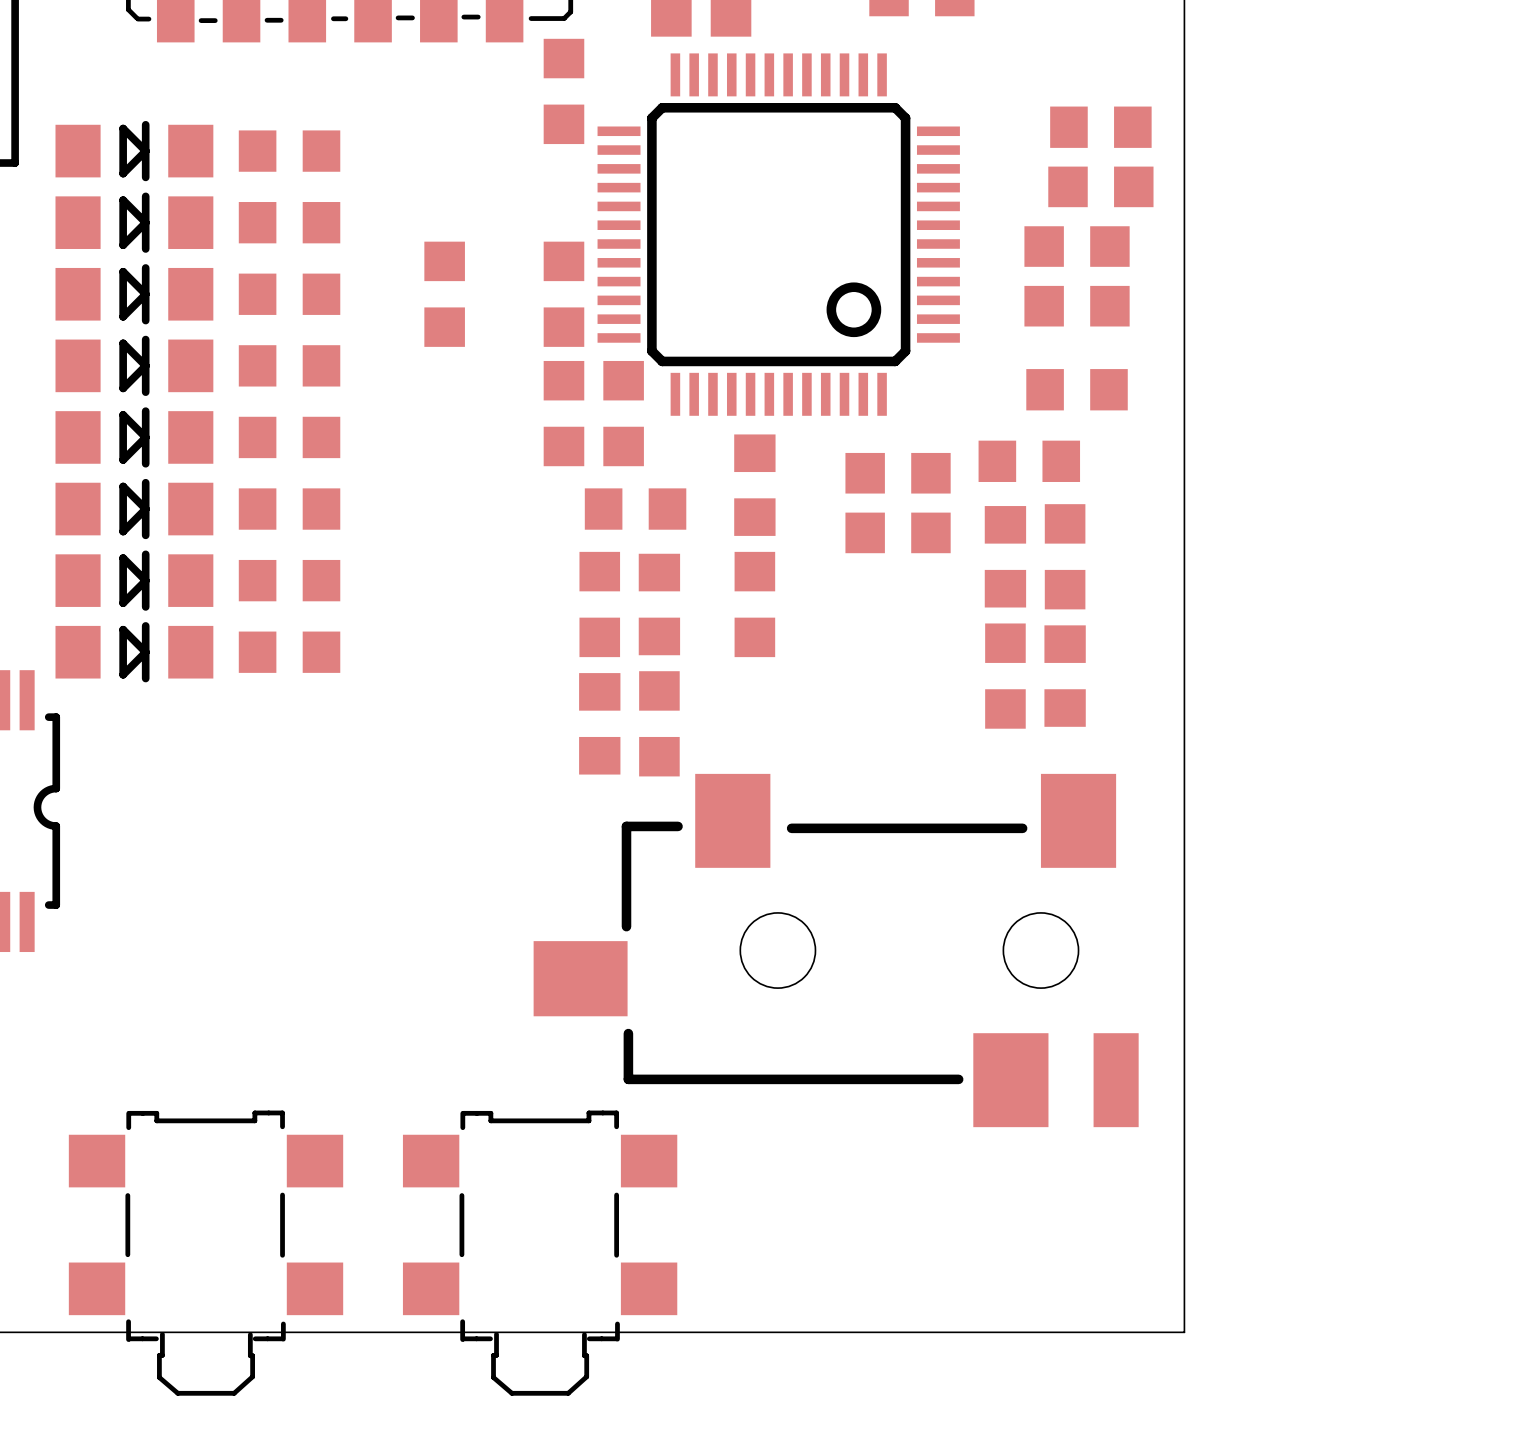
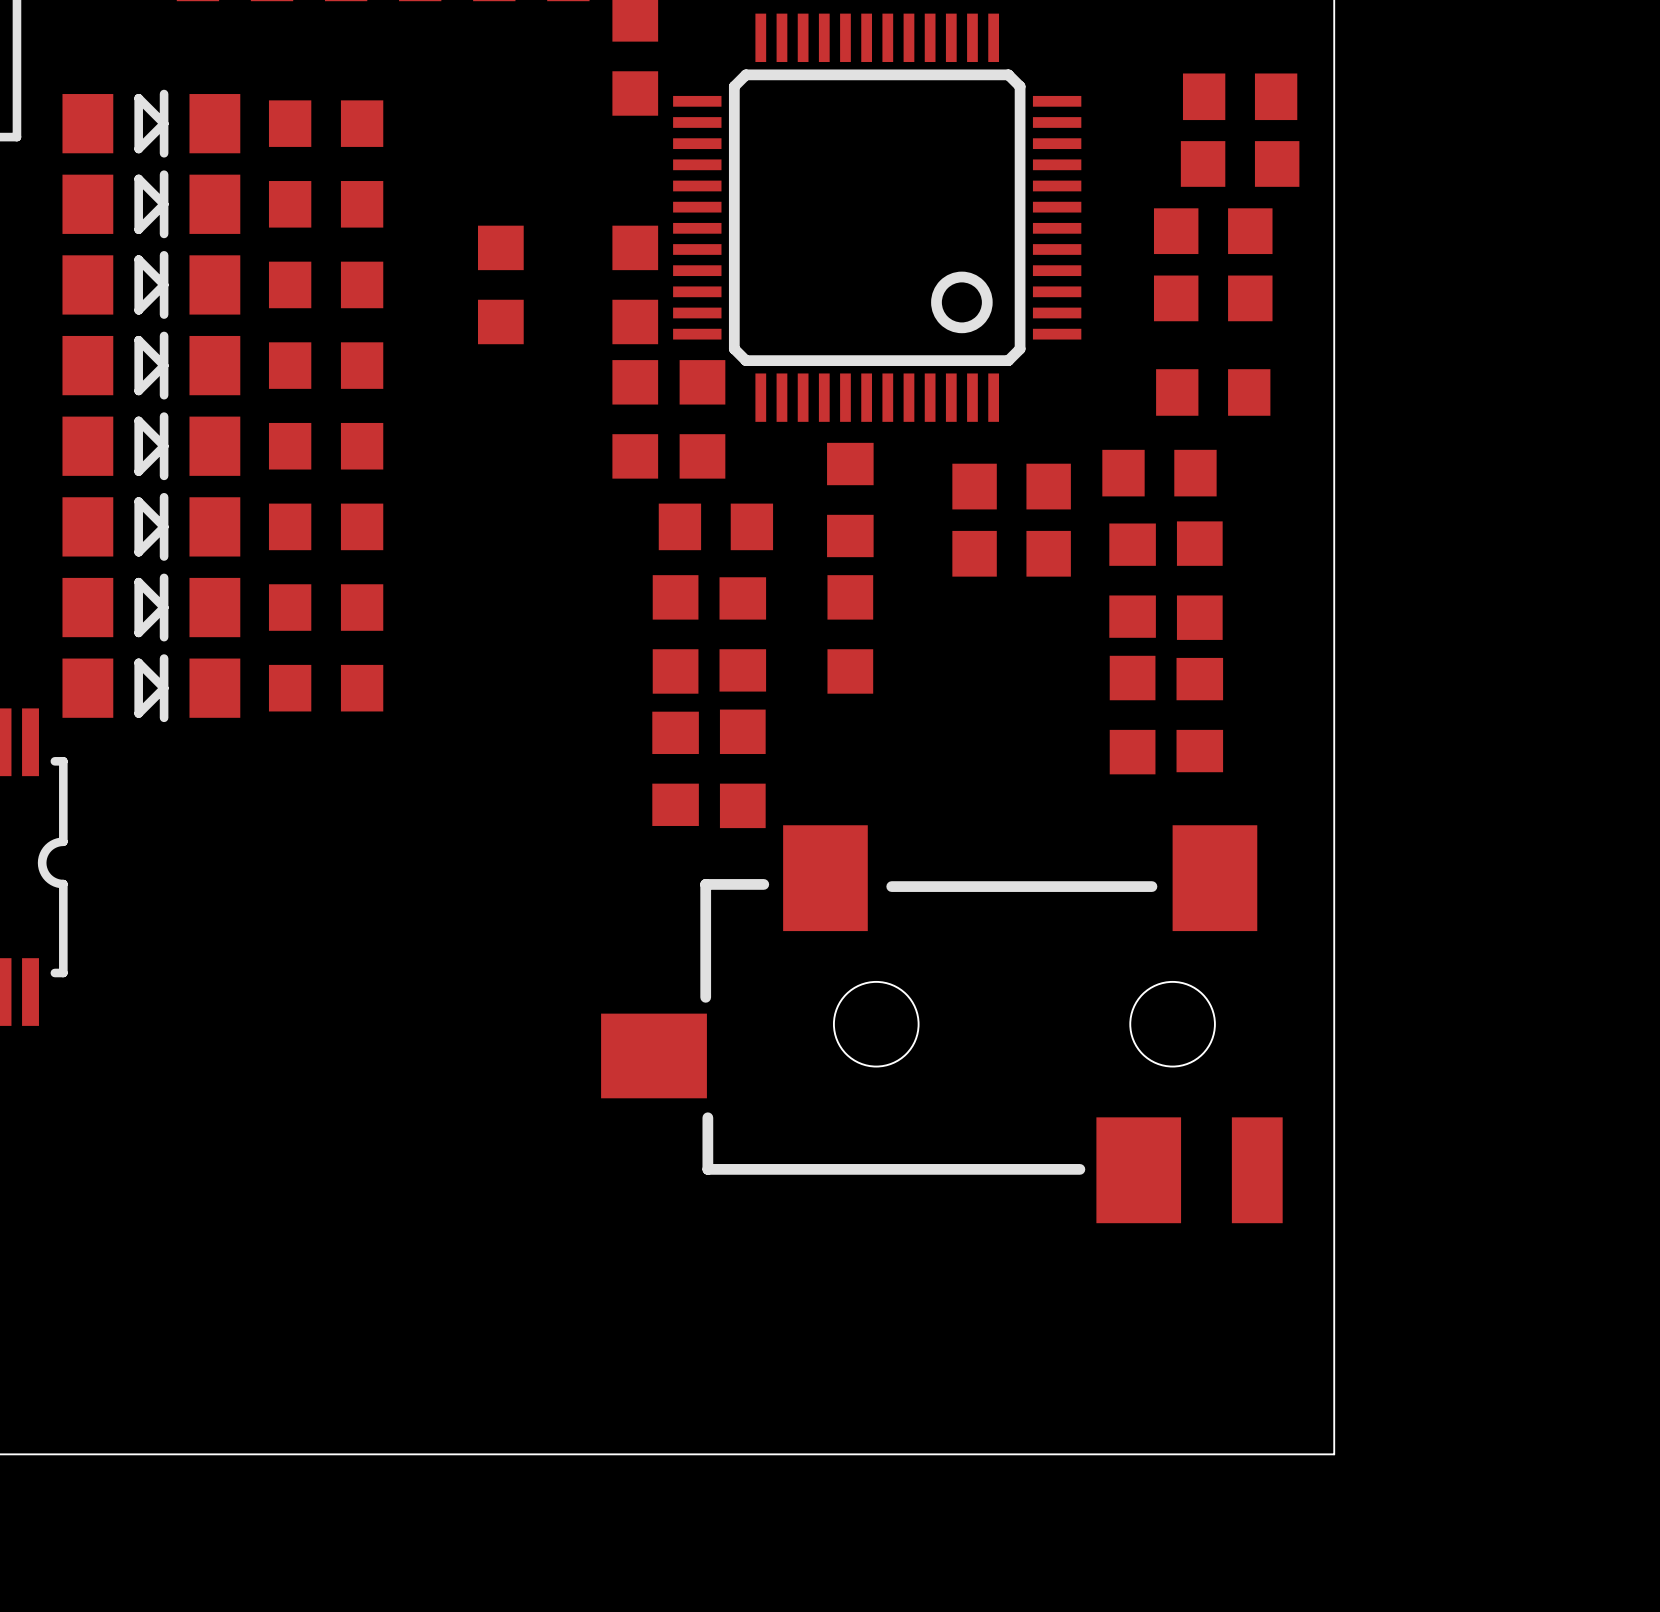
part: (206, 1253) -> none
part: (540, 1253) -> none

